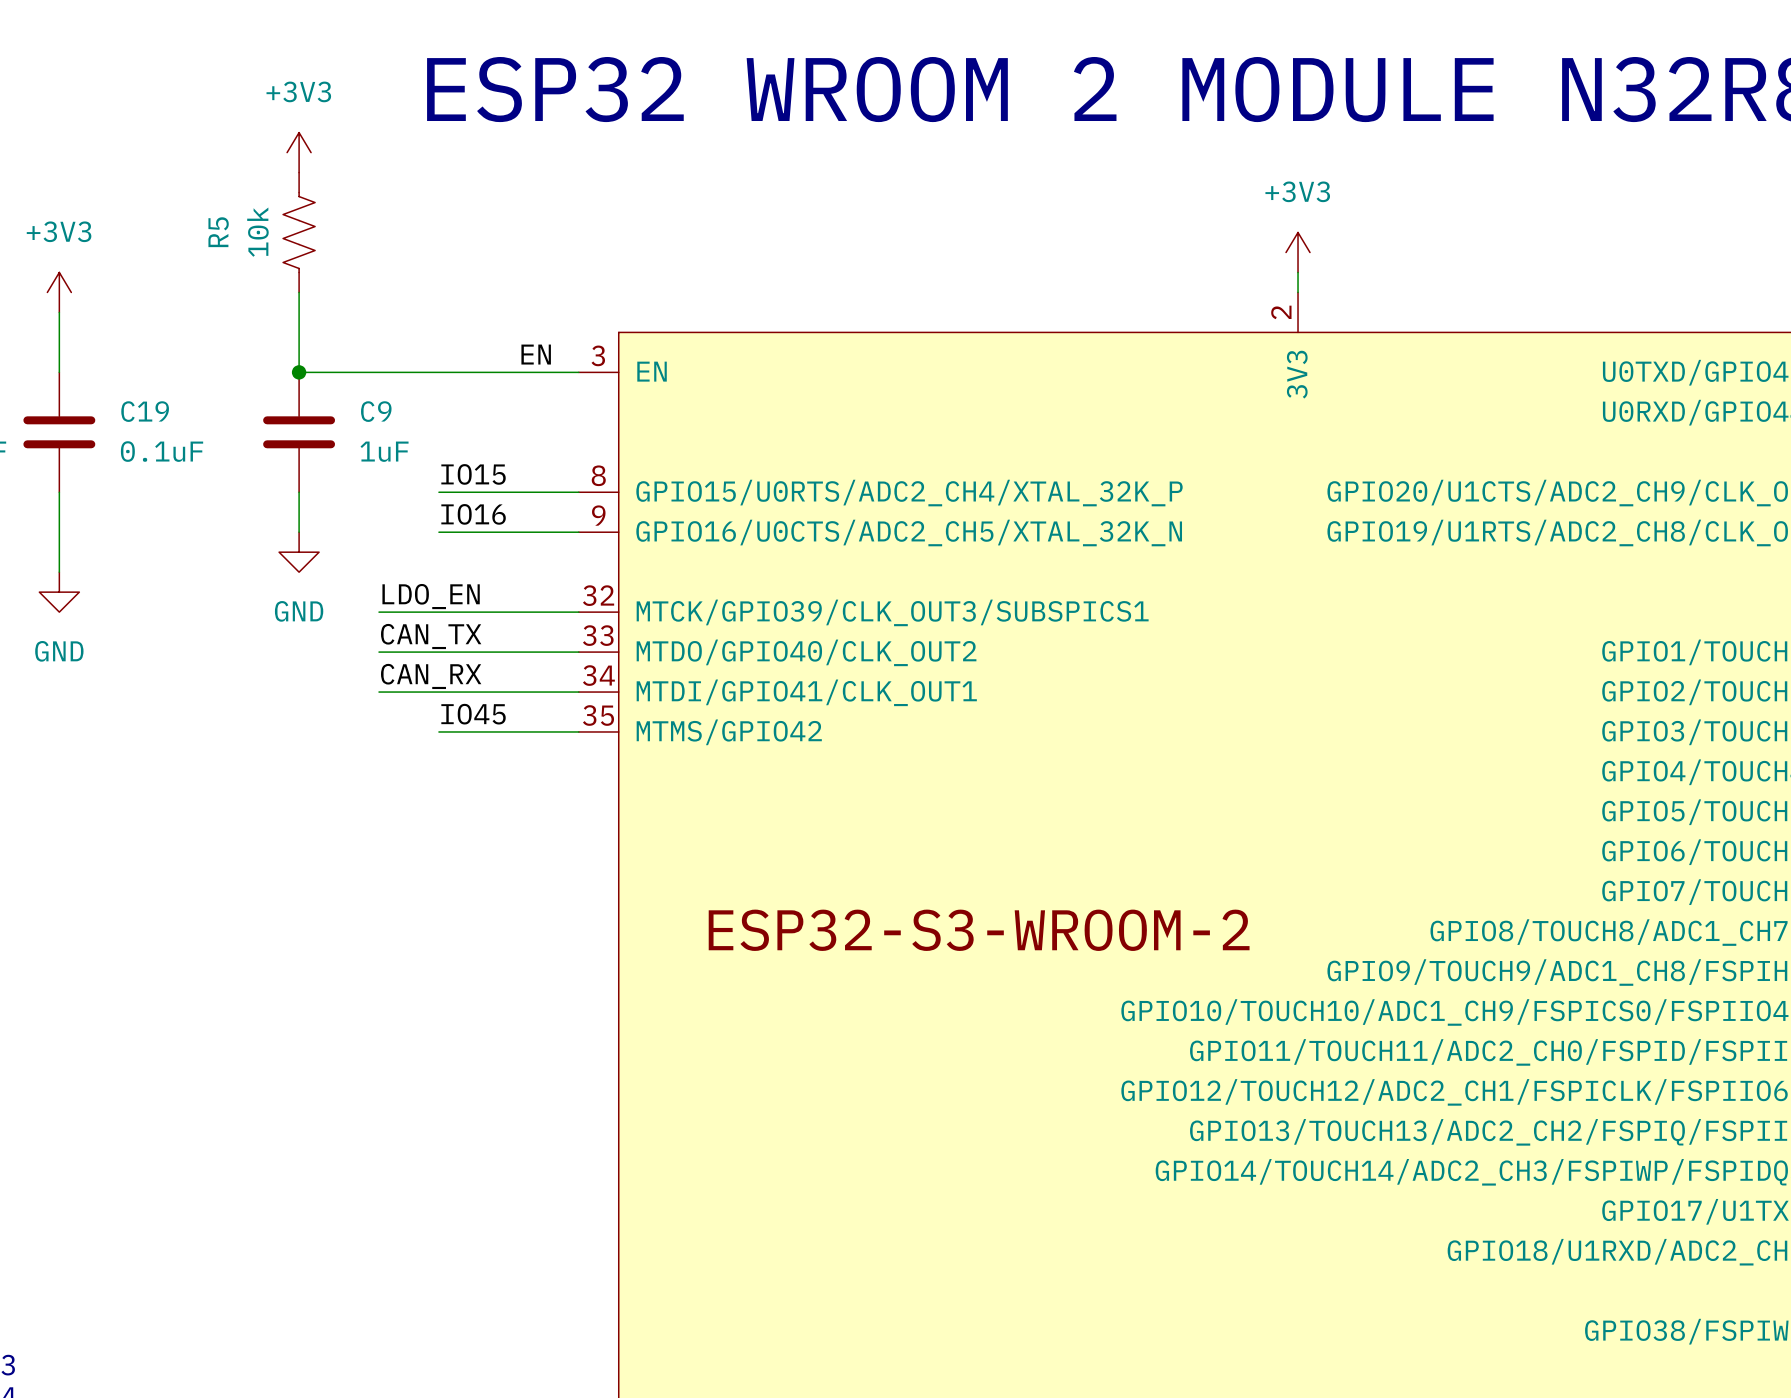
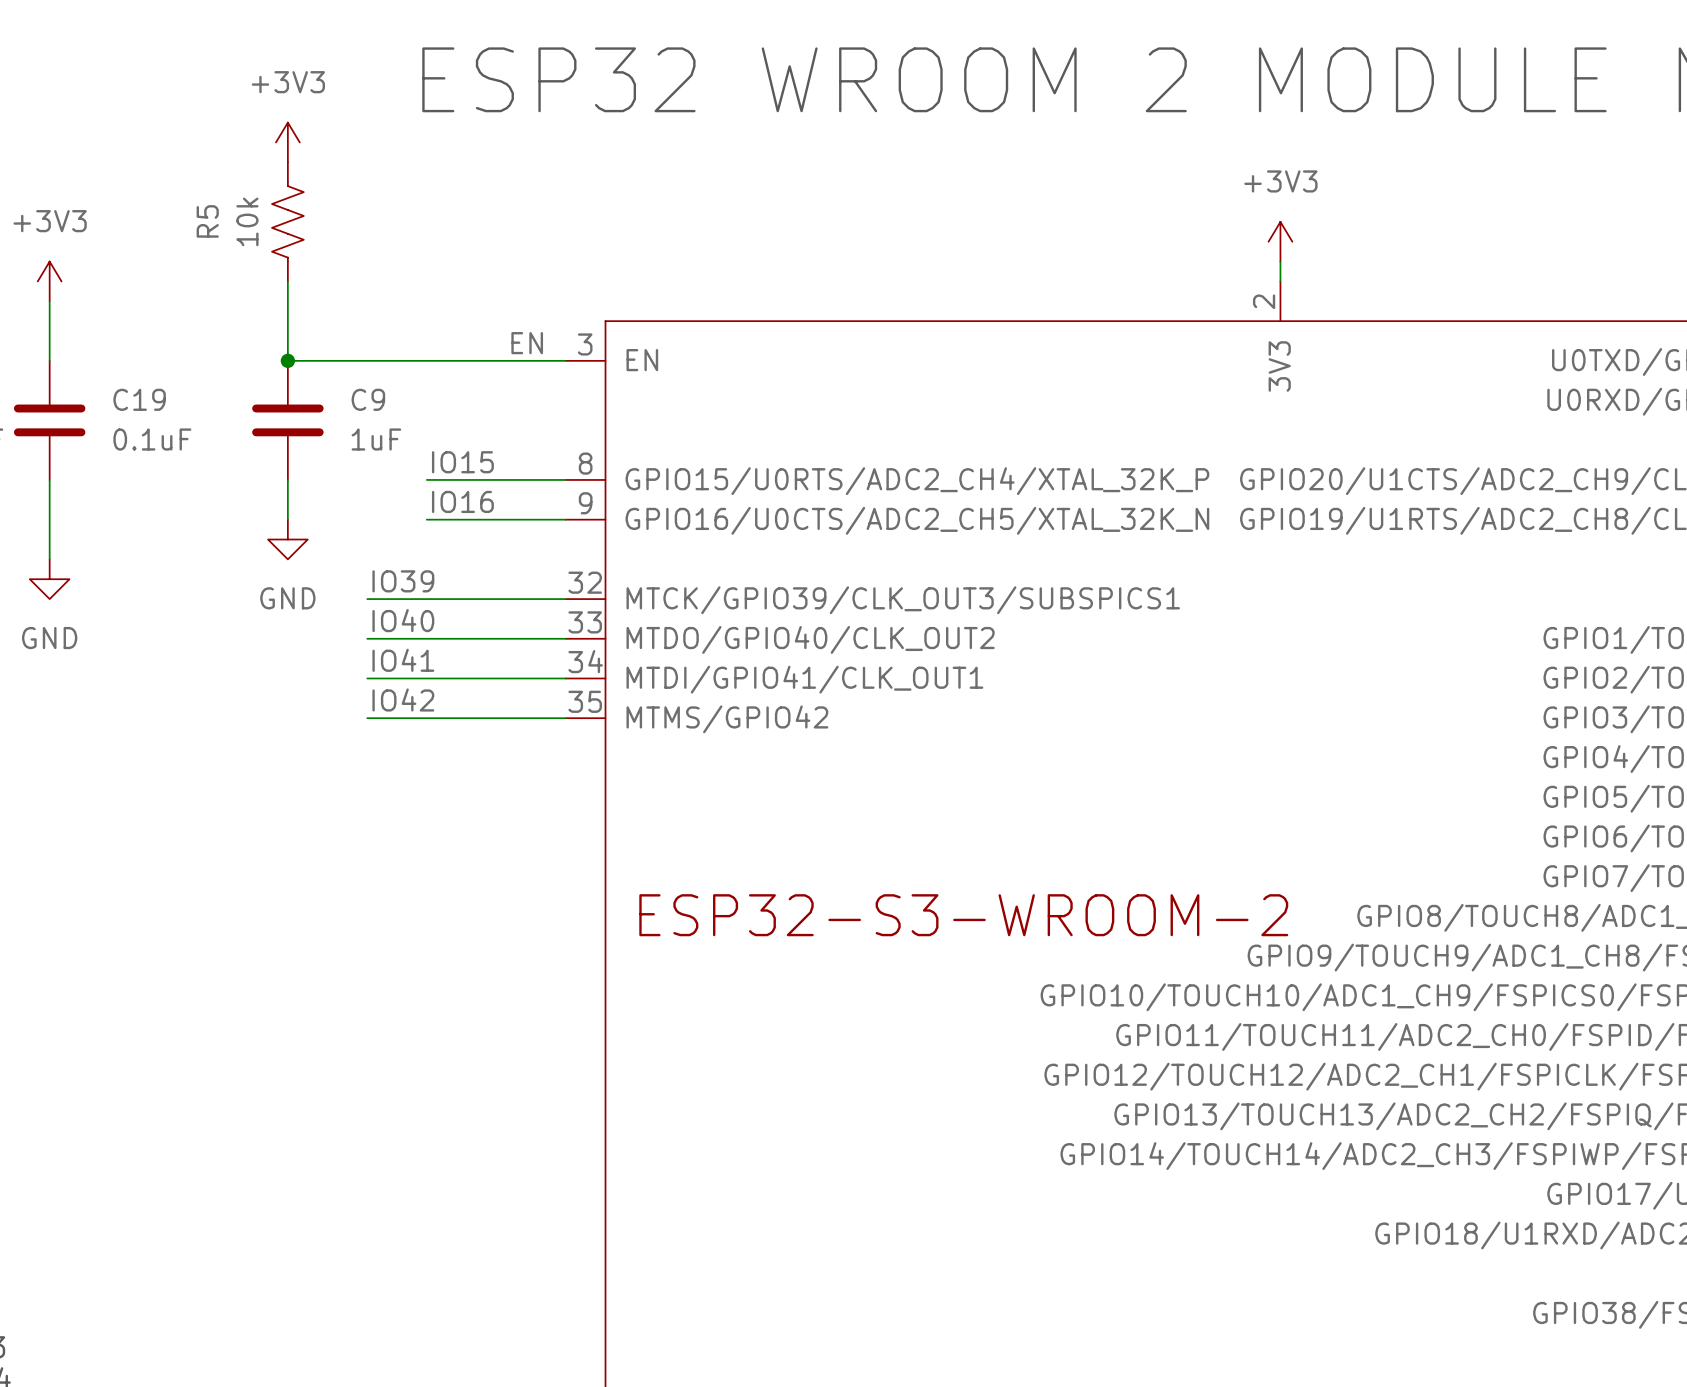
label: LDO_EN (431, 596) -> IO39 (403, 581)
label: CAN_TX (431, 636) -> IO40 (403, 620)
label: CAN_RX (431, 676) -> IO41 (403, 660)
label: IO45 (473, 714) -> IO42 (403, 699)
wire: none -> (367, 718) (426, 718)

